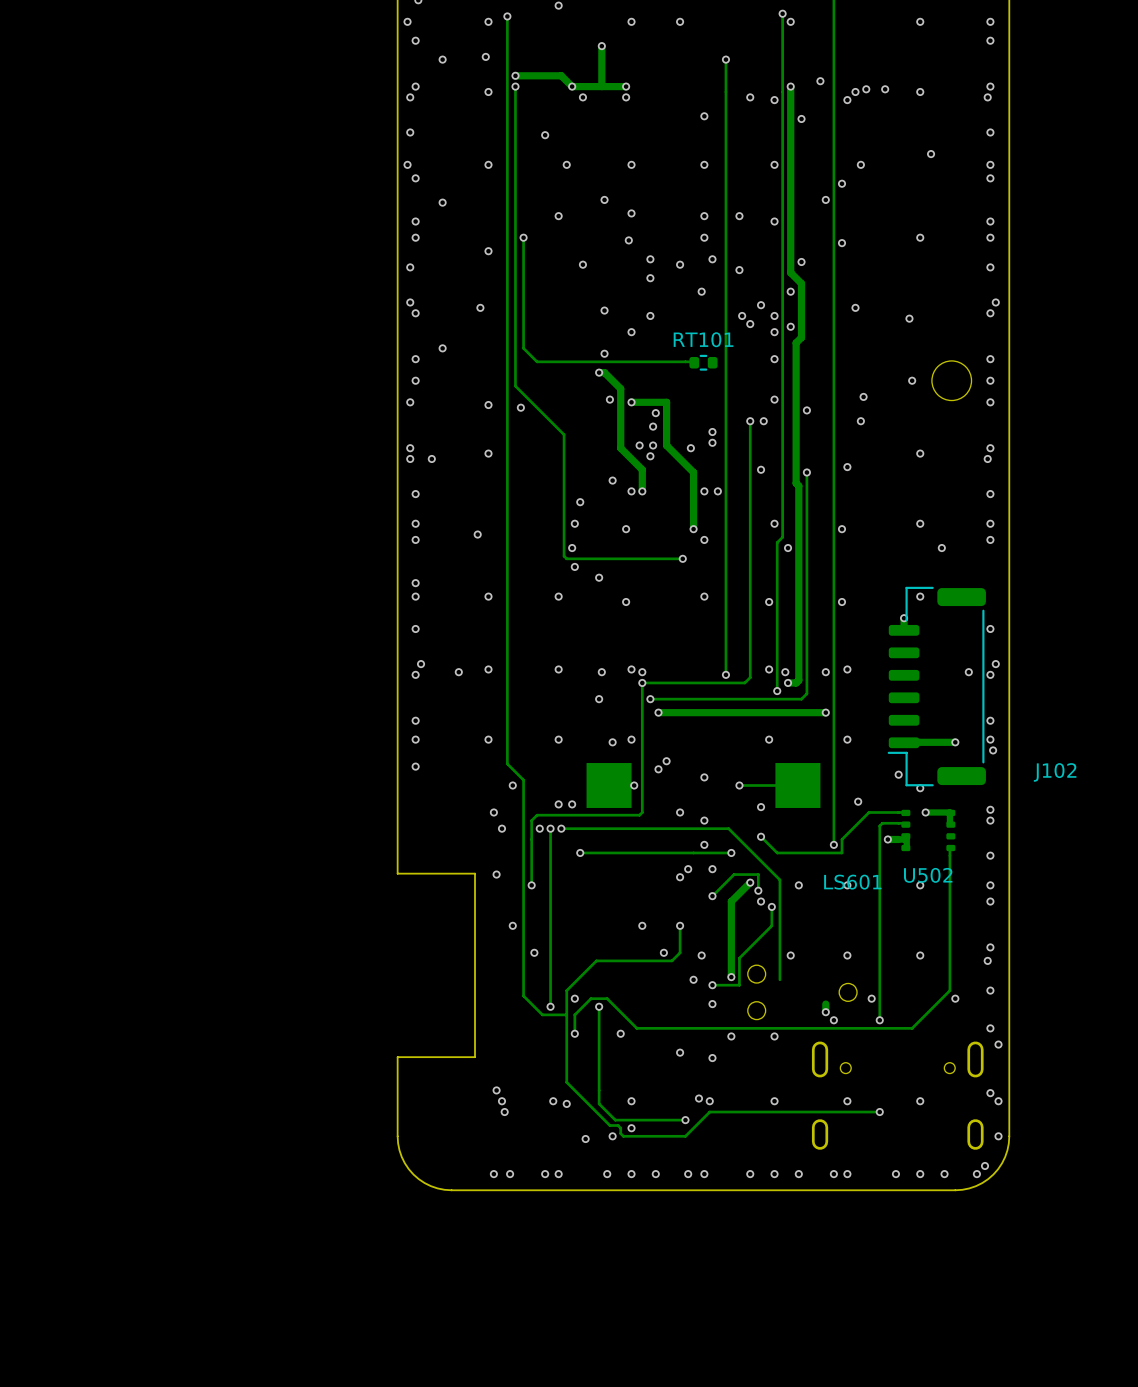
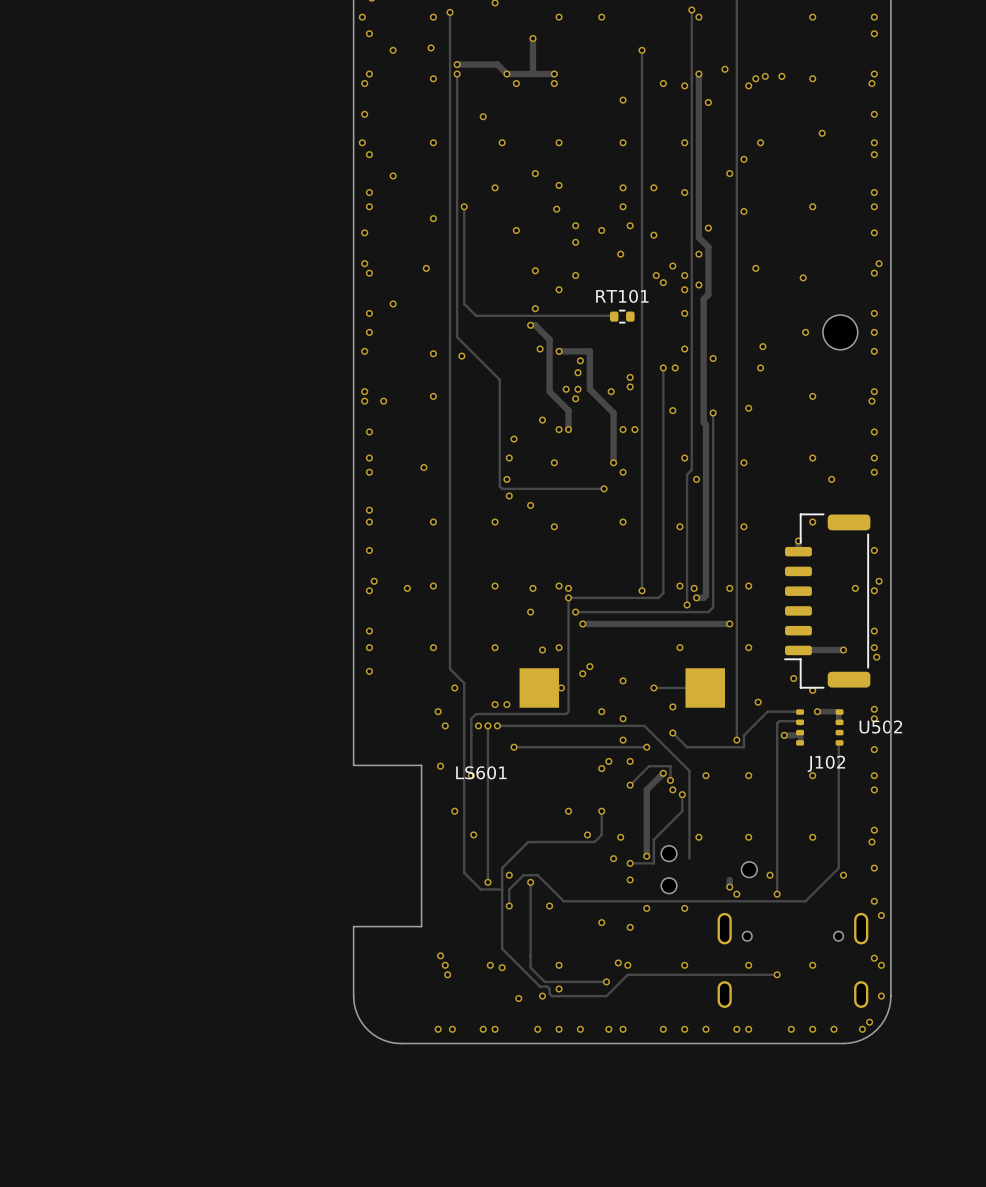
J102 name position: J102 (1055, 772) -> J102 (826, 763)
U502 name position: U502 (928, 875) -> U502 (880, 727)
LS601 name position: LS601 (852, 882) -> LS601 (481, 772)

